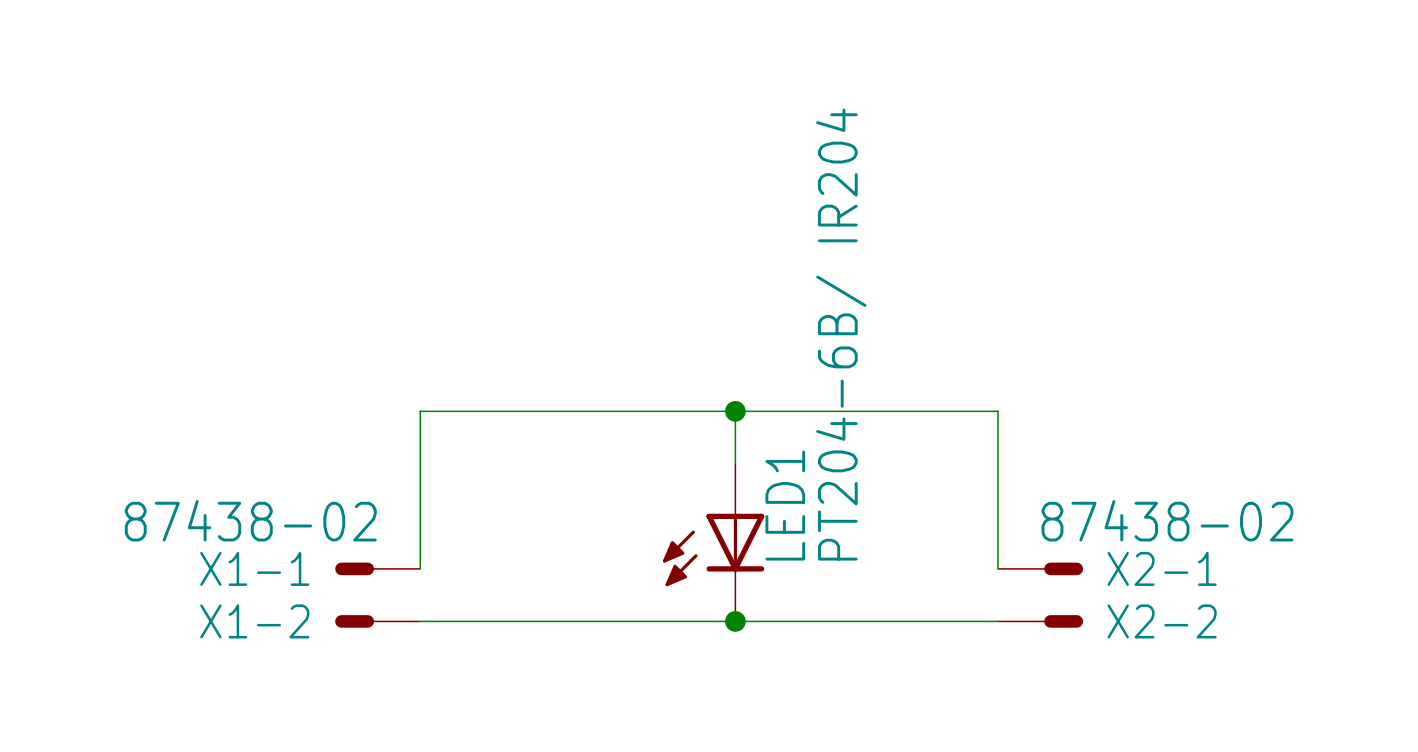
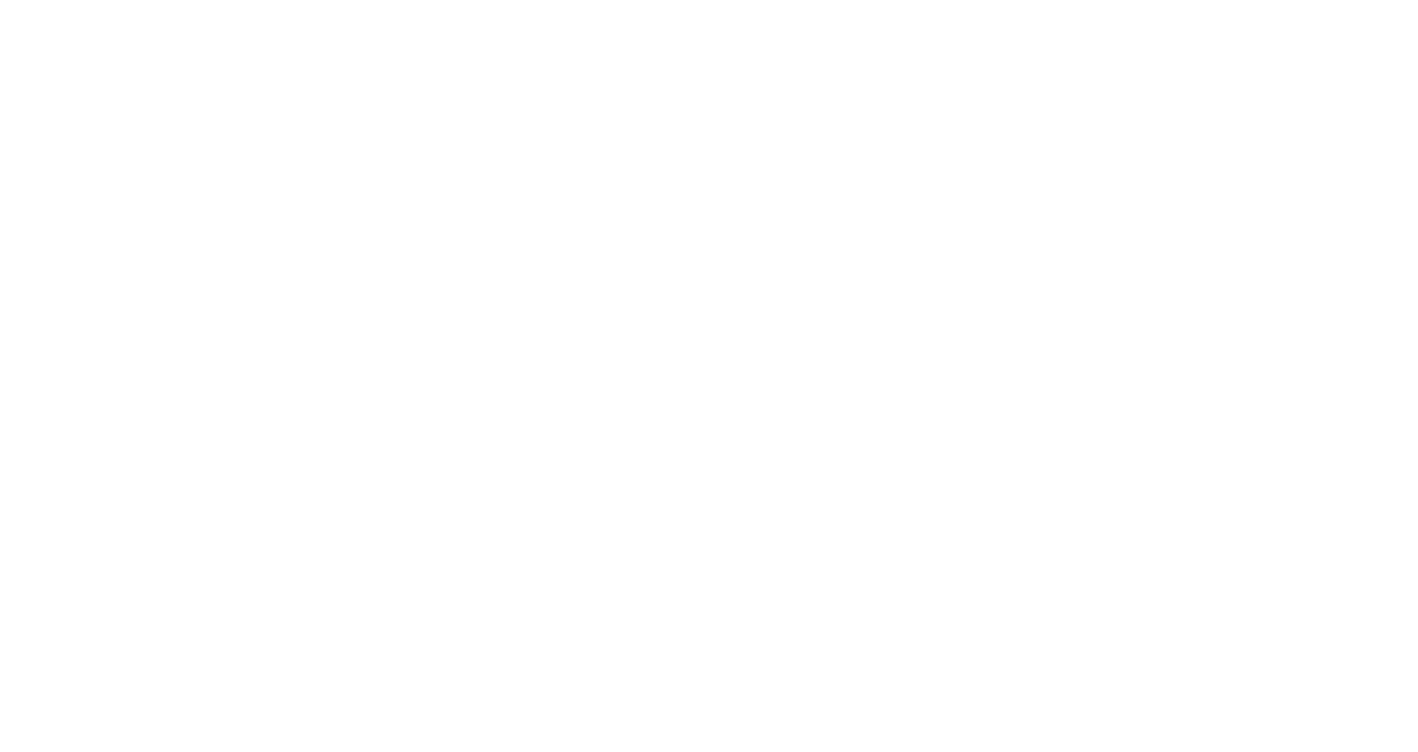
wire: (735, 411) (735, 463) -> none
junction: (735, 411) -> none
LED1: PT204-6B/ IR204 (713, 542) -> none
X1-1: 87438-02 (377, 568) -> none
wire: (420, 568) (420, 411) (998, 411) (998, 568) -> none
X2-1: 87438-02 (1040, 568) -> none
X1-2: (377, 621) -> none
wire: (420, 621) (998, 621) -> none
junction: (735, 621) -> none
X2-2: (1040, 621) -> none

